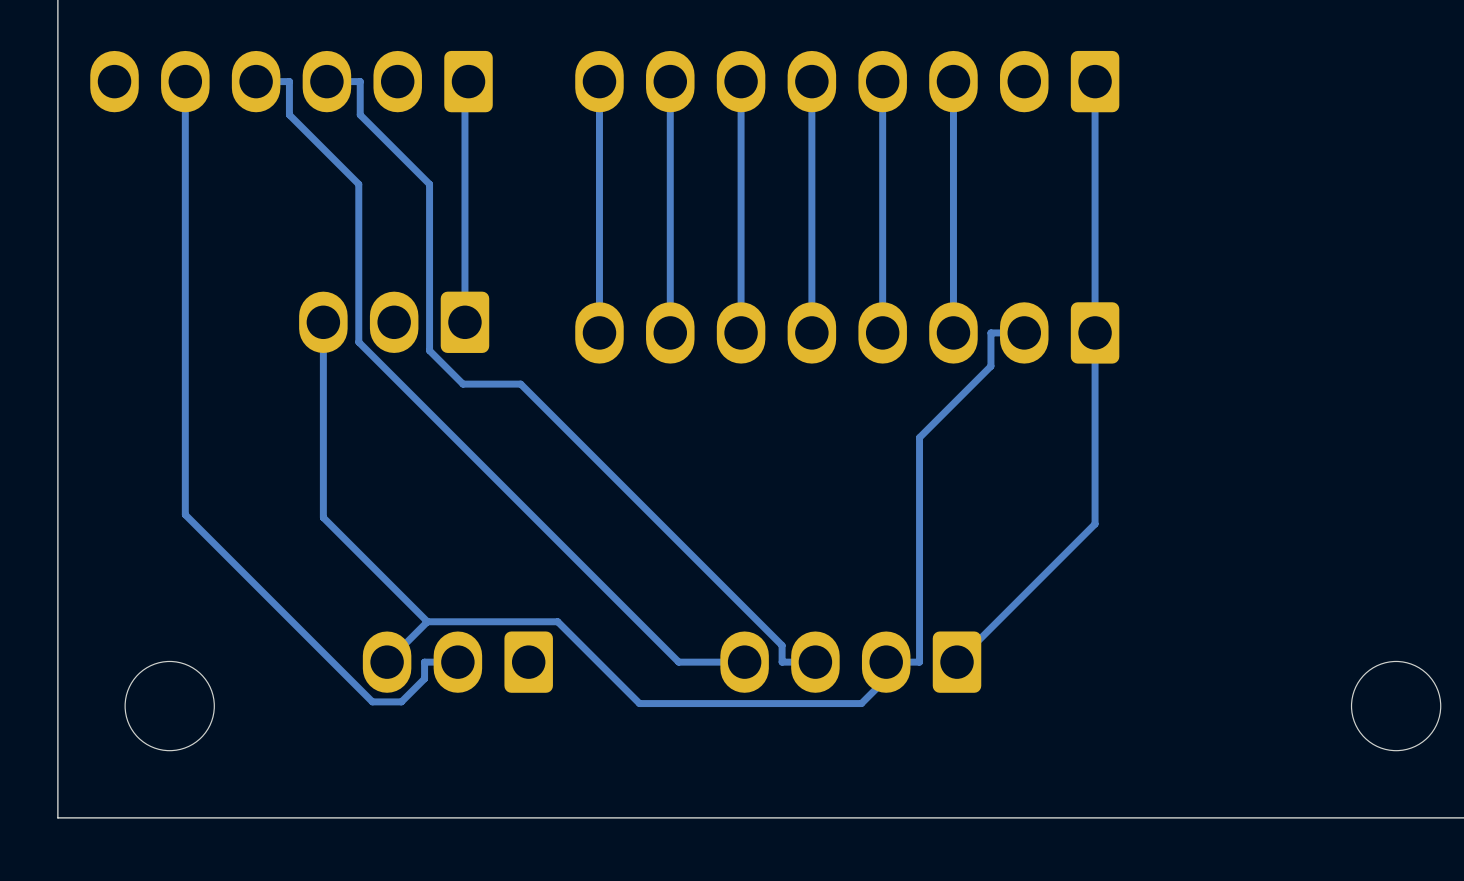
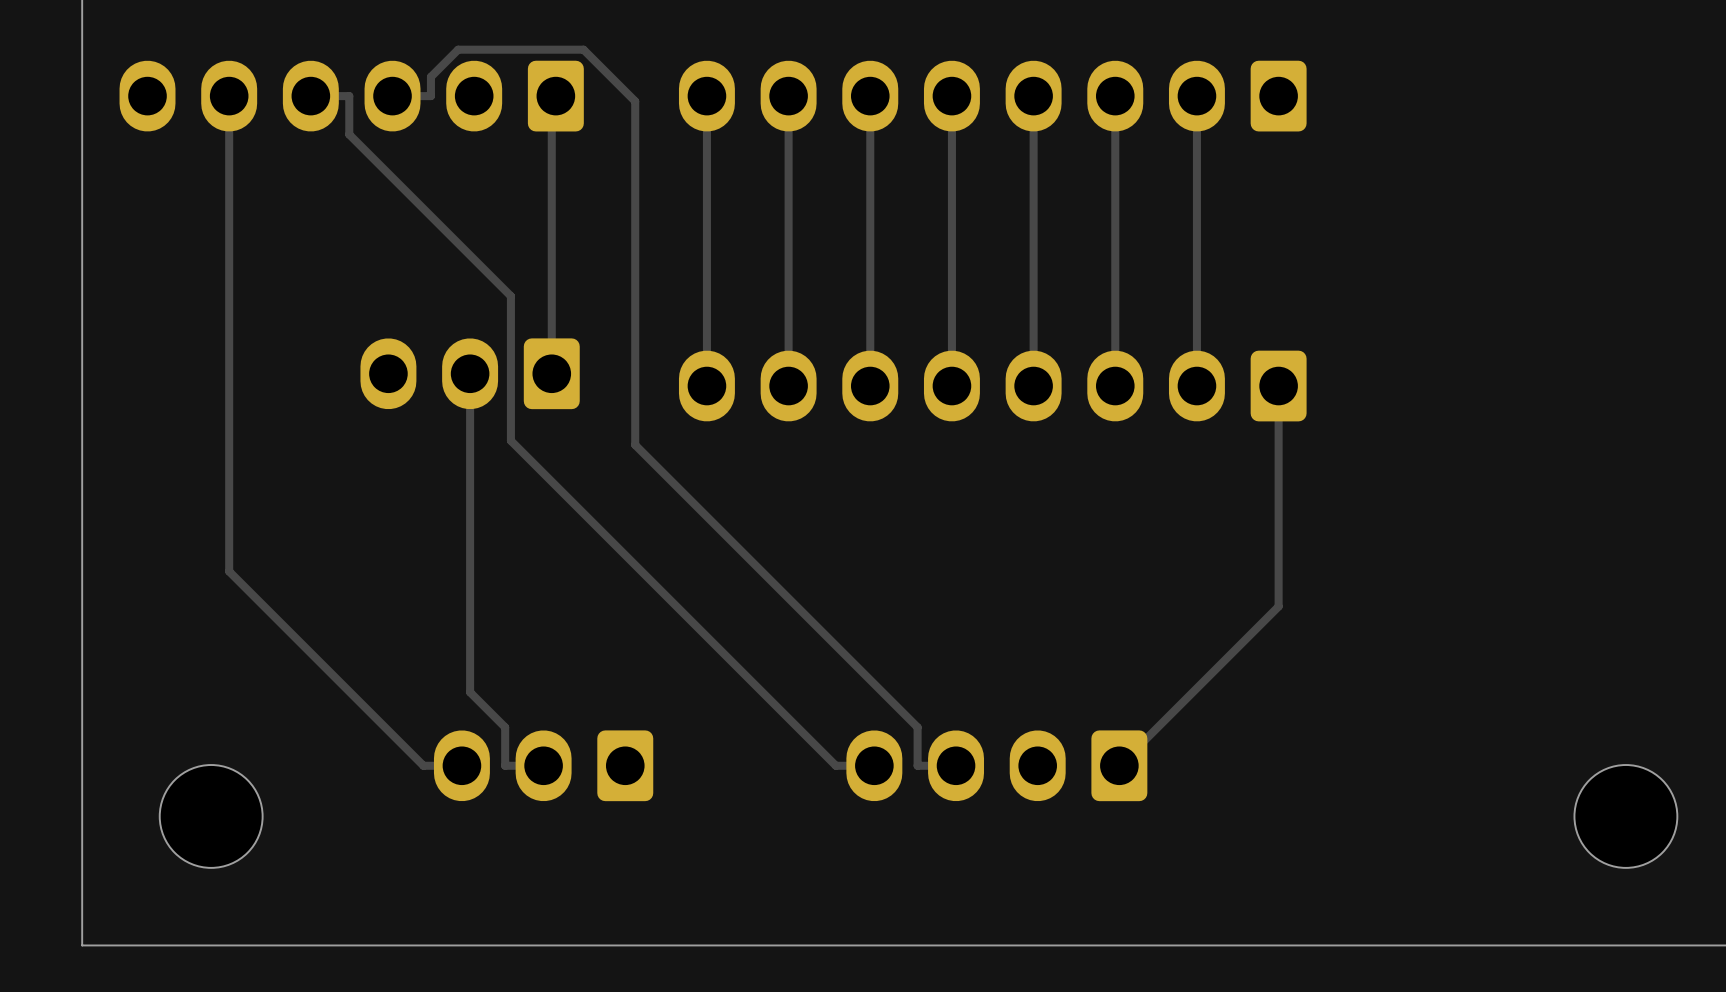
track: (360, 81) (360, 114) (429, 184) (429, 255) -> (429, 214) (510, 296)
track: none -> (430, 96) (430, 76) (458, 49) (583, 49) (635, 101) (635, 444) (917, 727) (917, 746)
track: (1095, 81) (1095, 332) -> none
track: (358, 184) (358, 342) (678, 662) (711, 662) -> none
track: (323, 322) (323, 517) (427, 621) -> none
track: none -> (470, 373) (470, 692) (505, 727) (505, 765)
track: (1024, 332) (990, 332) (990, 366) (919, 437) (919, 662) (886, 662) -> (1196, 386) (1196, 96)
track: (429, 350) (463, 384) (520, 384) (782, 645) -> (510, 406) (510, 440) (835, 765)
track: (185, 493) (185, 514) (372, 701) (401, 701) (424, 678) (424, 662) -> (229, 571) (423, 765) (461, 765)
track: (427, 621) (387, 662) -> none
track: (427, 621) (557, 621) (639, 703) (861, 703) (902, 662) -> none

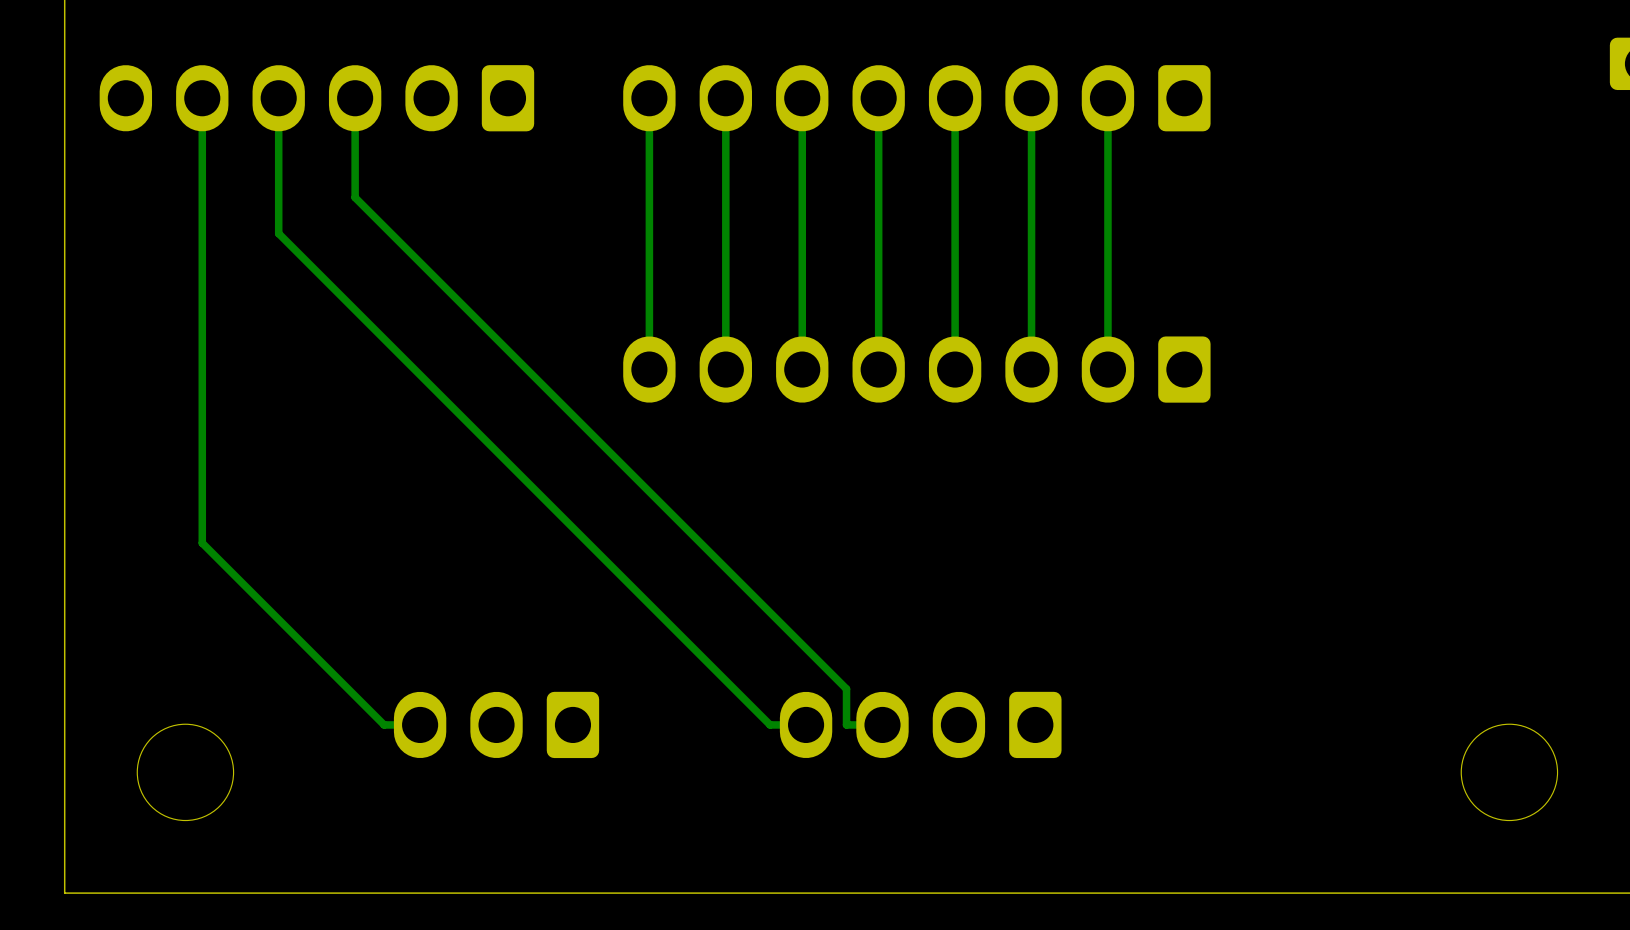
track: (310, 96) (349, 96) (349, 134) (510, 296) (510, 440) -> (278, 98) (278, 233) (465, 420)
track: (392, 96) (430, 96) (430, 76) (458, 49) (583, 49) (635, 101) (635, 444) -> (355, 98) (355, 197) (582, 424)
track: (555, 96) (551, 100) (551, 373) -> none
track: (470, 373) (470, 692) (505, 727) (505, 765) (543, 765) -> none
part: (470, 373) -> none
track: (1278, 386) (1278, 606) (1119, 765) -> none

